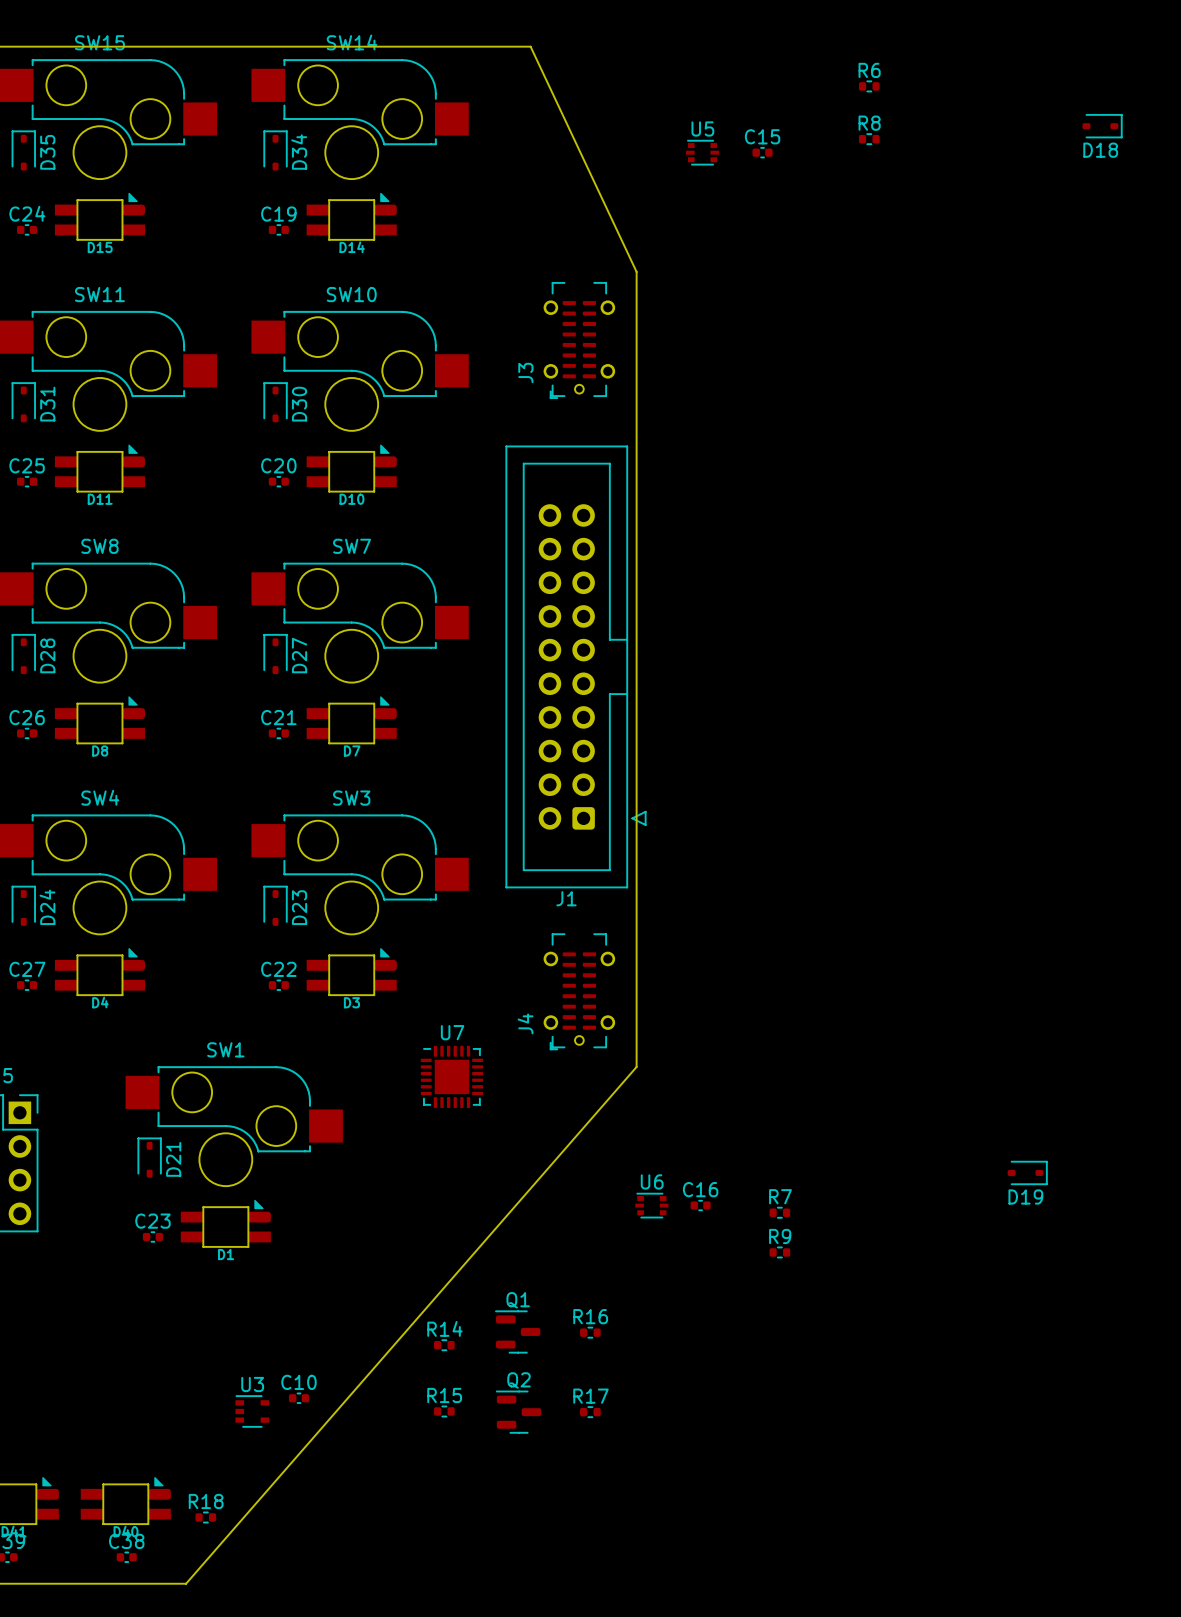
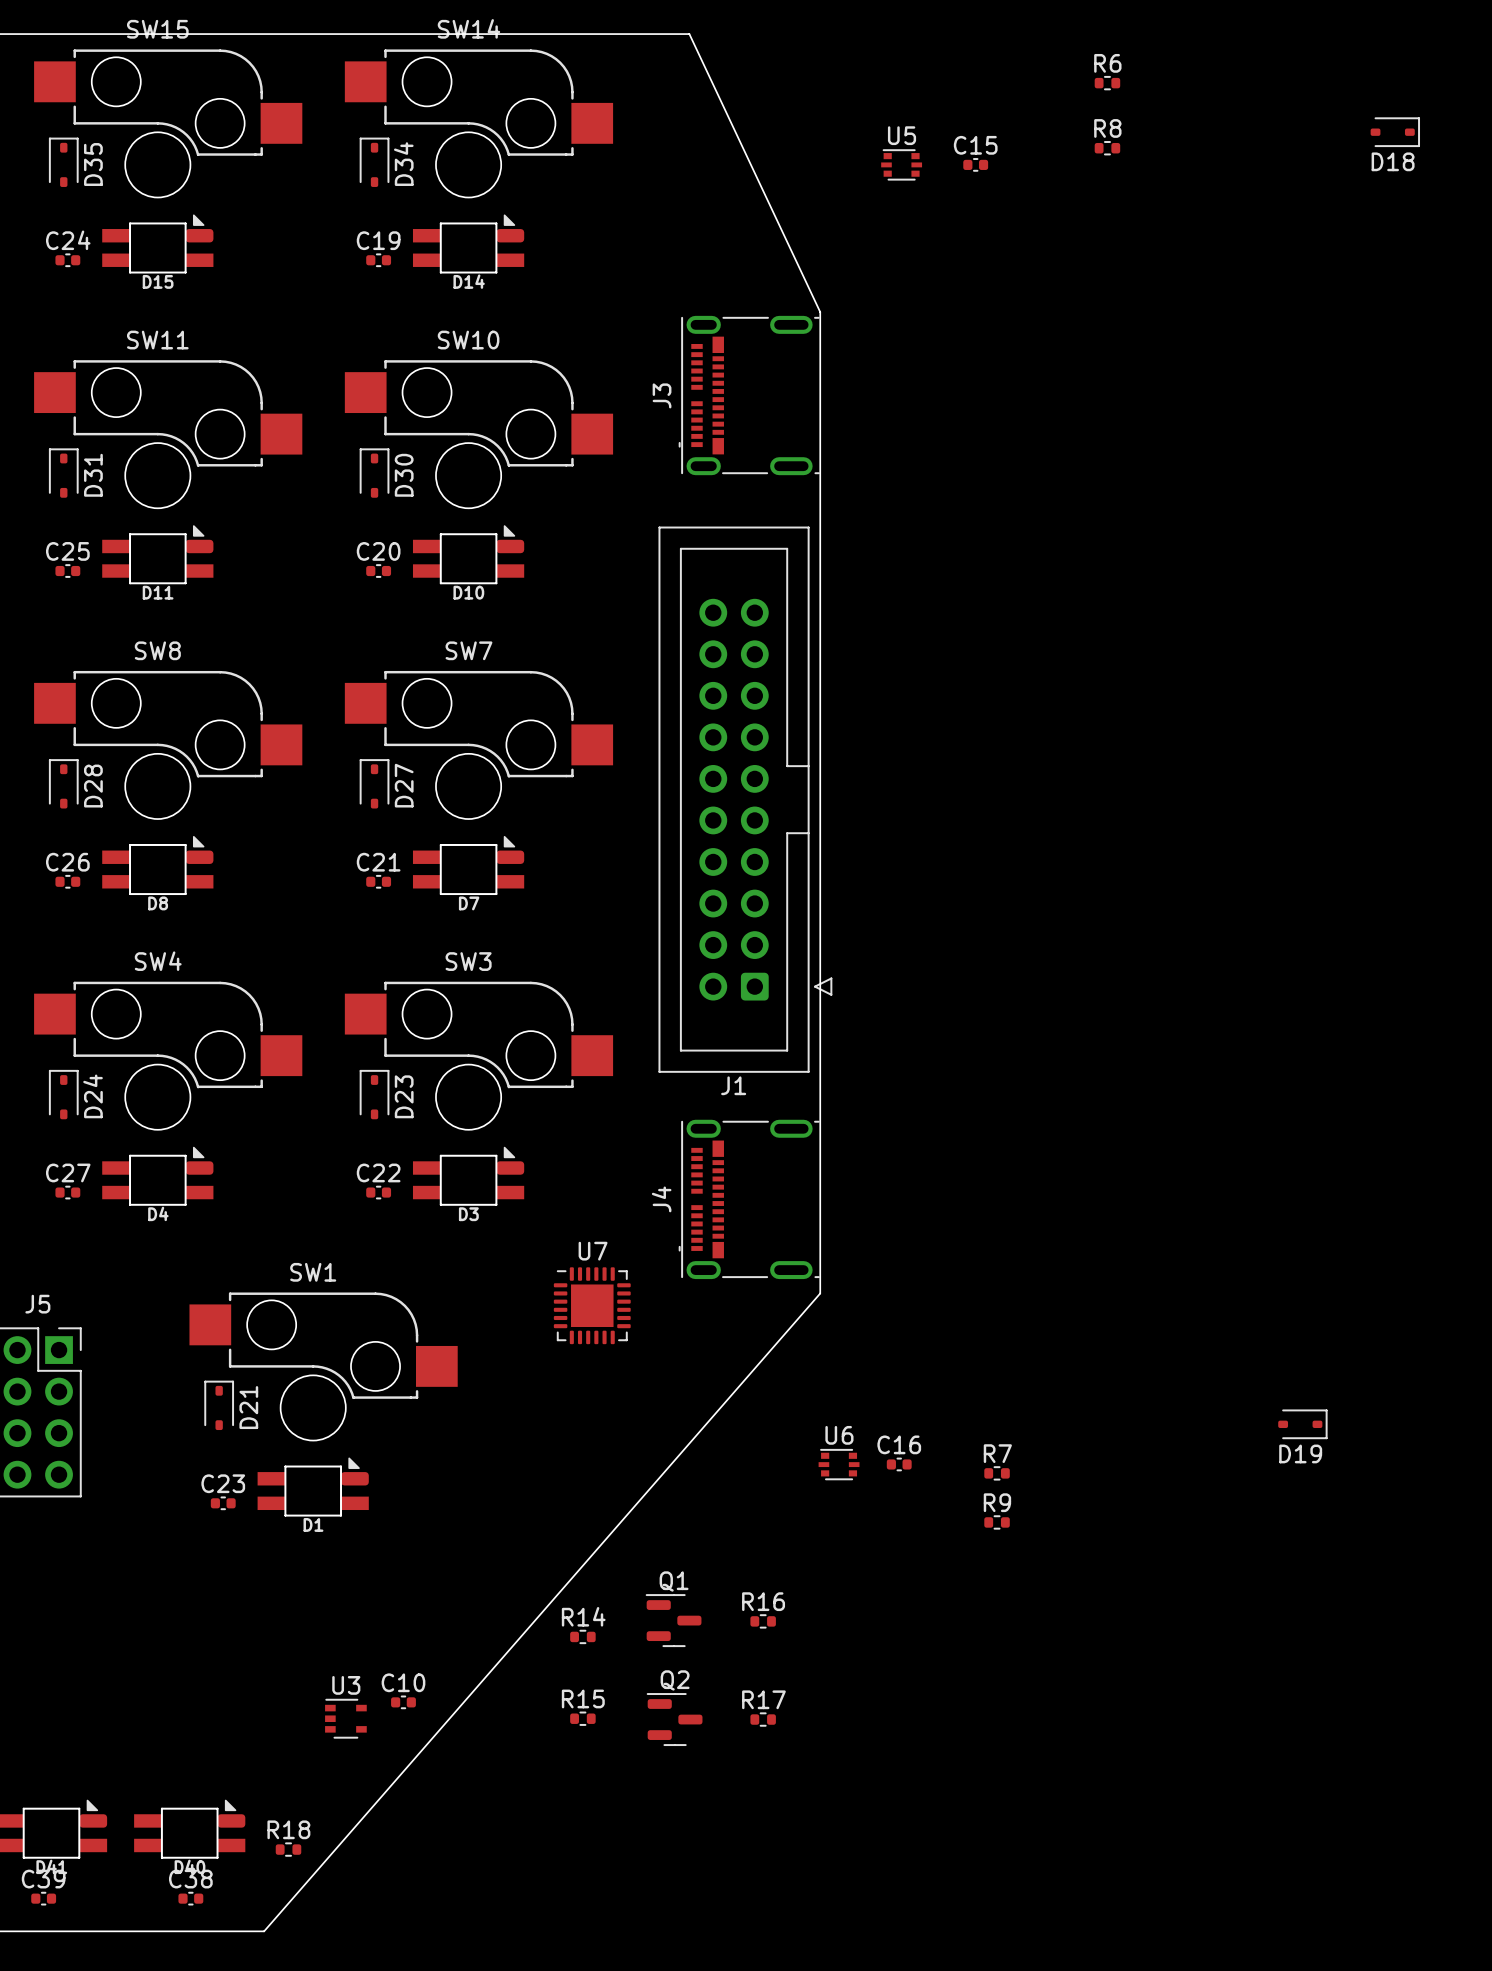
J3 footprint: [543, 282, 616, 399] -> [678, 315, 820, 476]
J3 name position: J3 (525, 372) -> J3 (662, 395)
J4 footprint: [543, 933, 616, 1051] -> [678, 1119, 820, 1280]
J4 name position: J4 (525, 1023) -> J4 (661, 1199)

